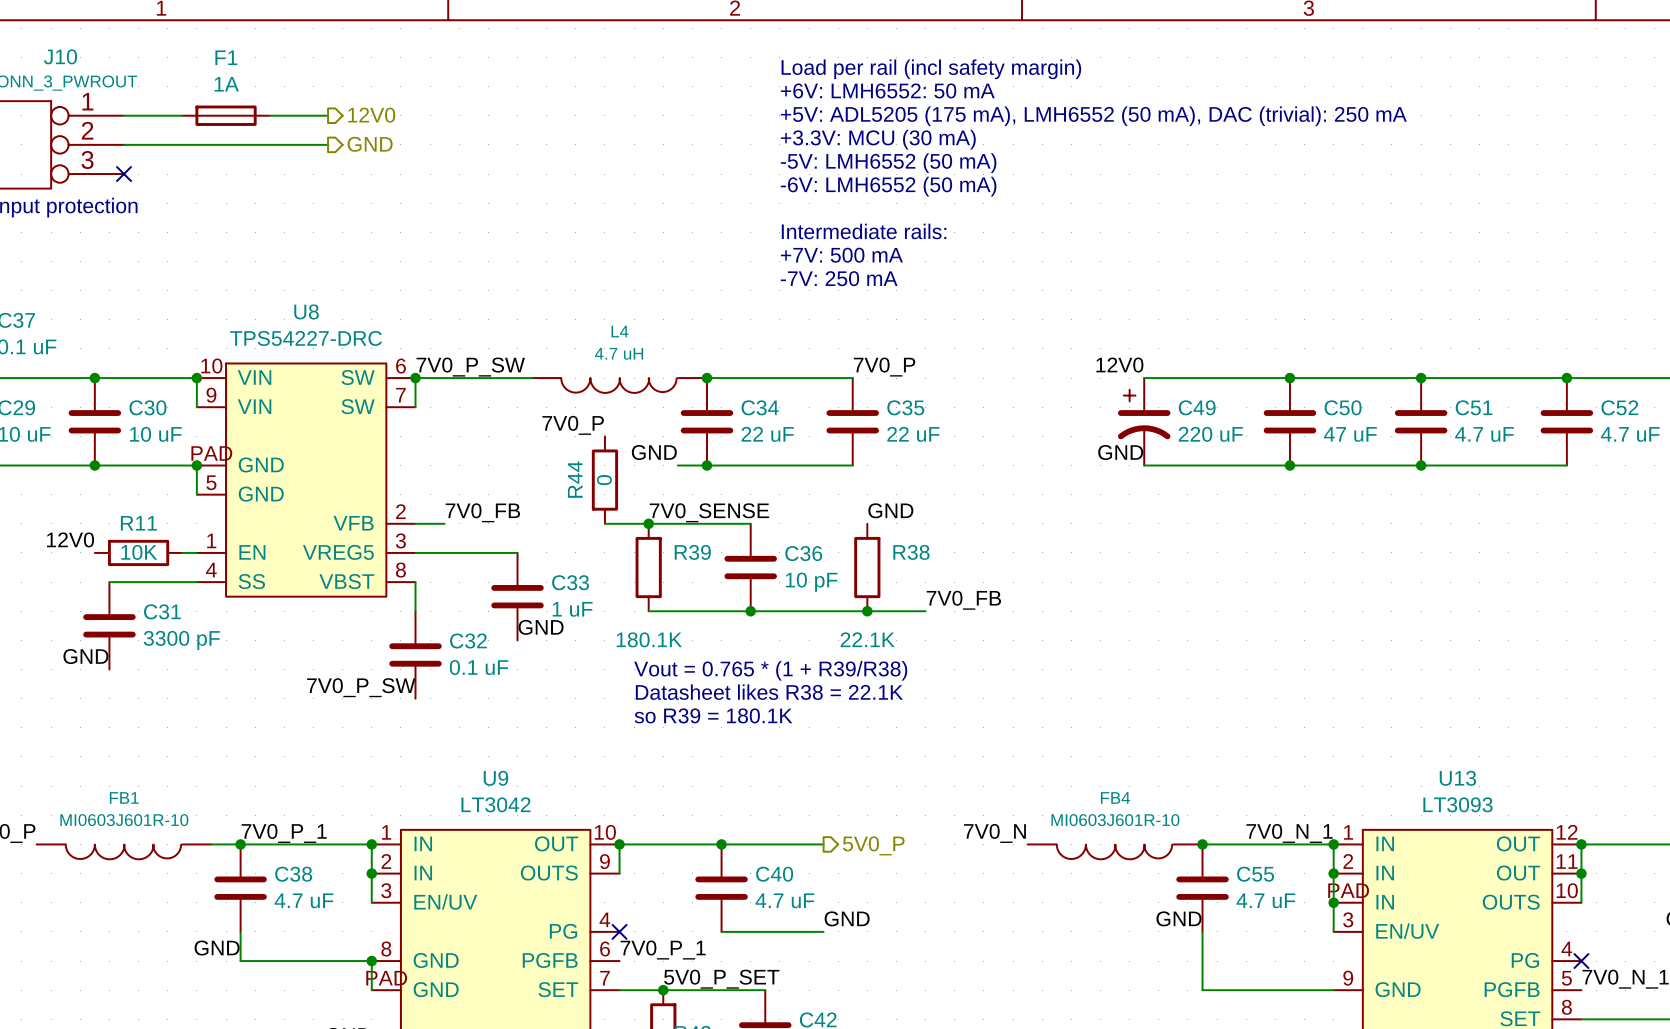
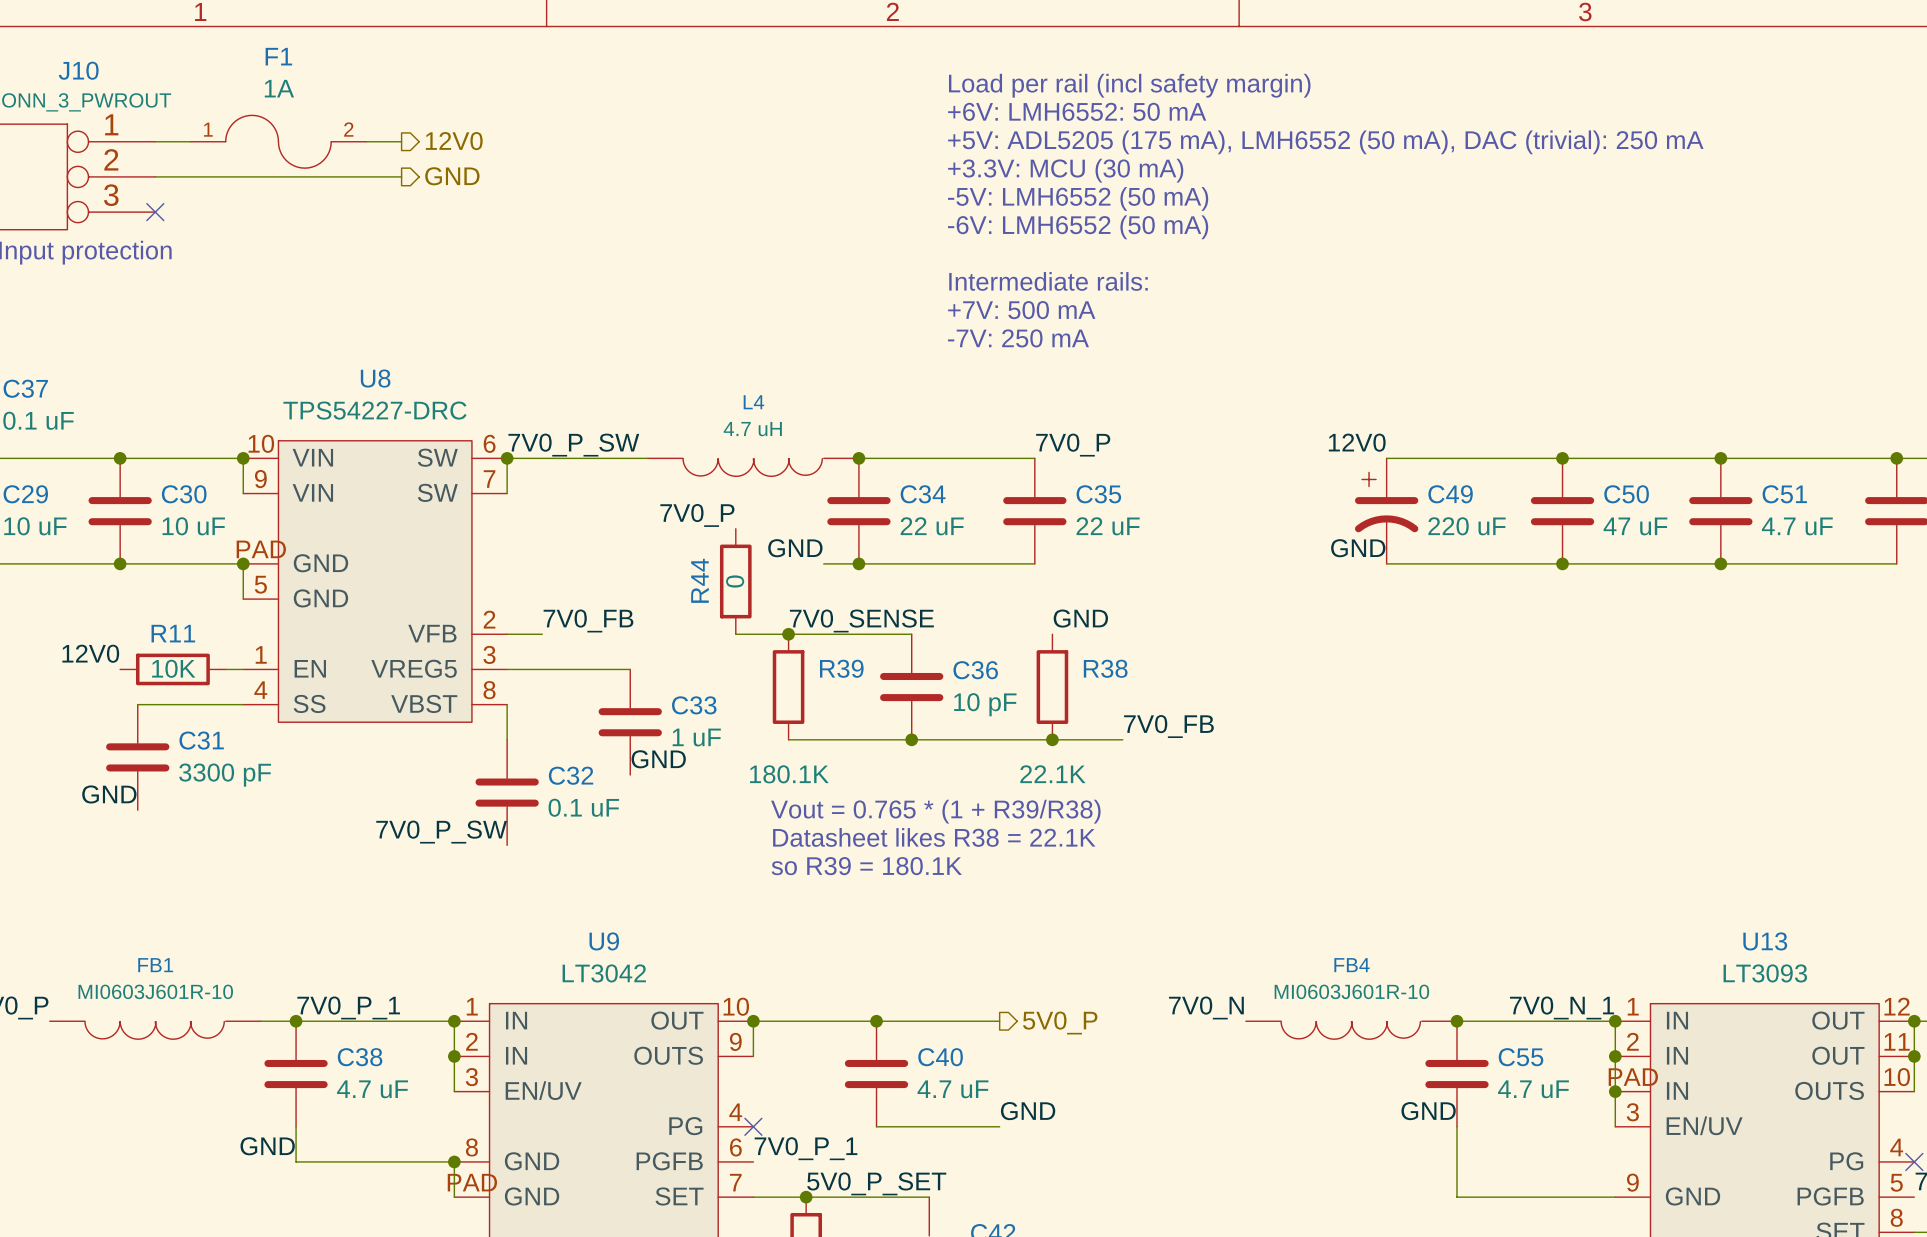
F1 symbol: [182, 105, 270, 126] -> [190, 115, 367, 169]

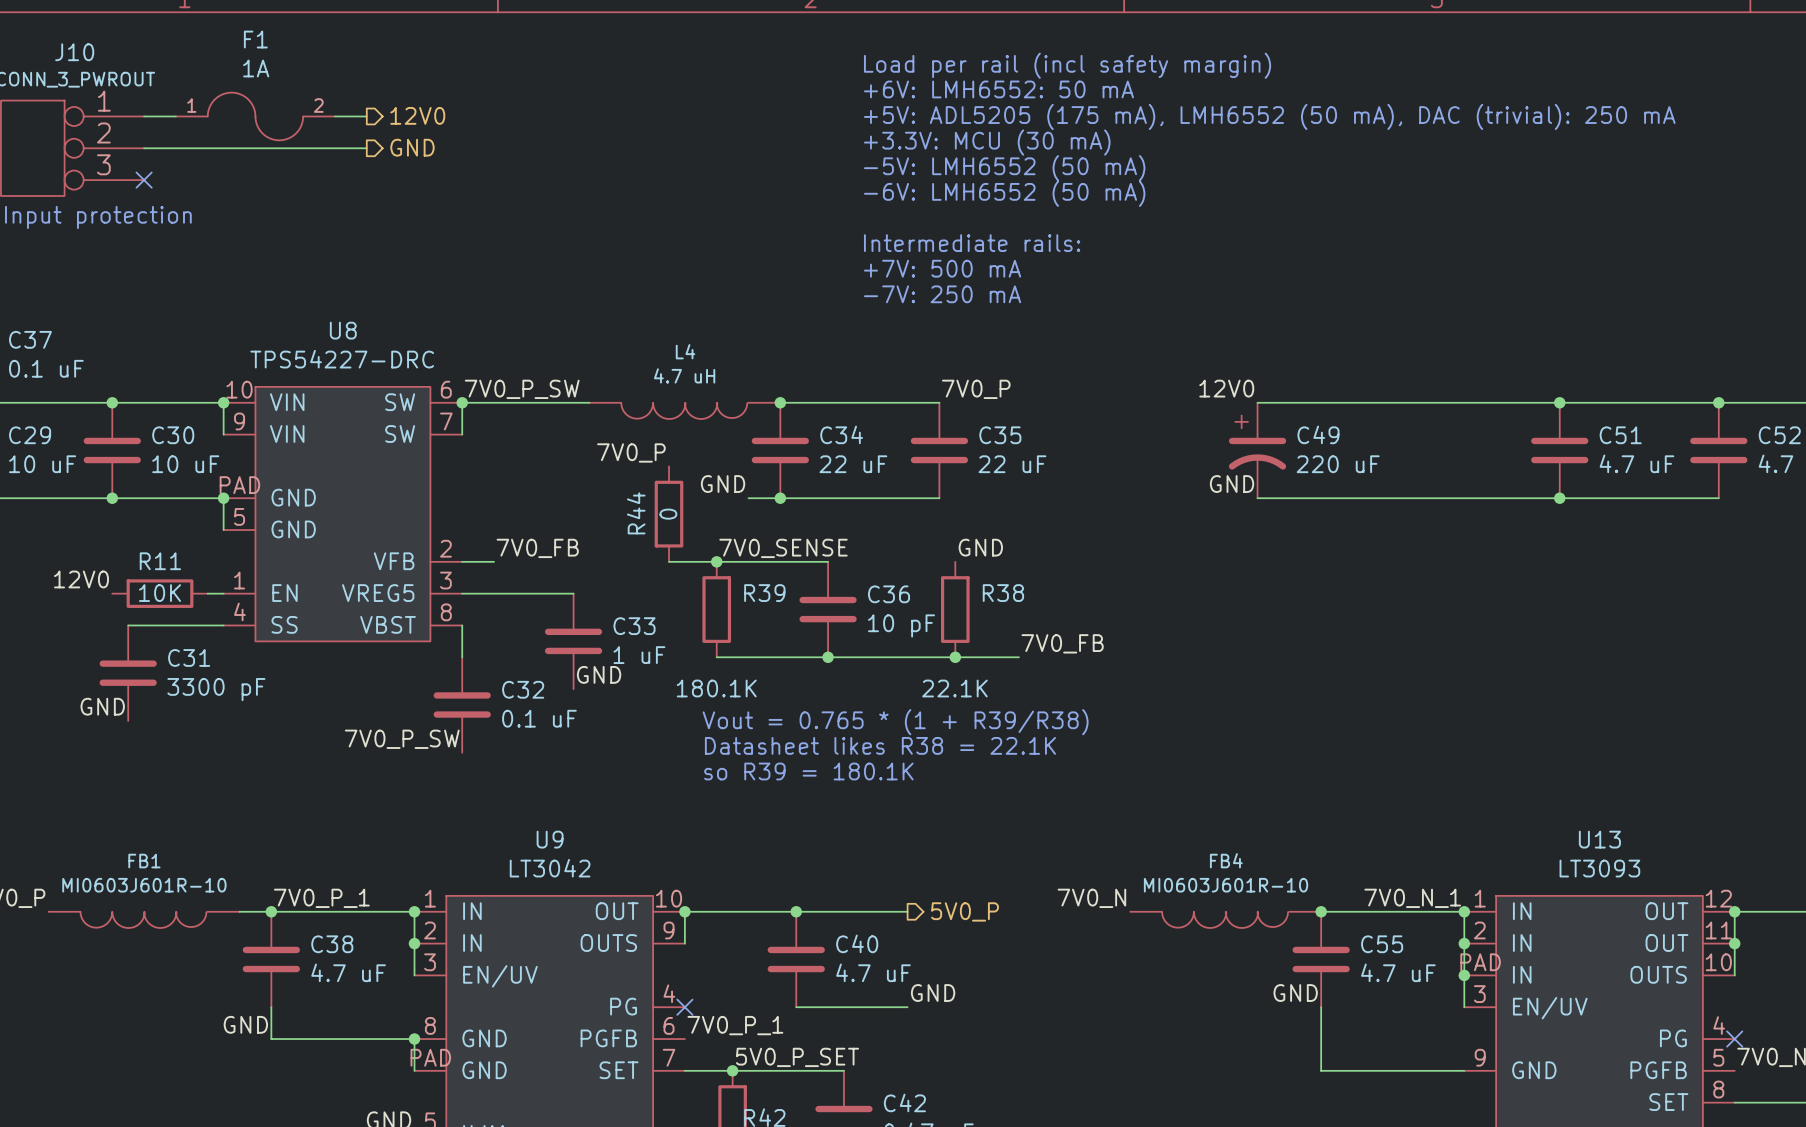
junction: (1562, 458) -> none
C50: 47 uF (1562, 511) -> none
junction: (1562, 563) -> none

